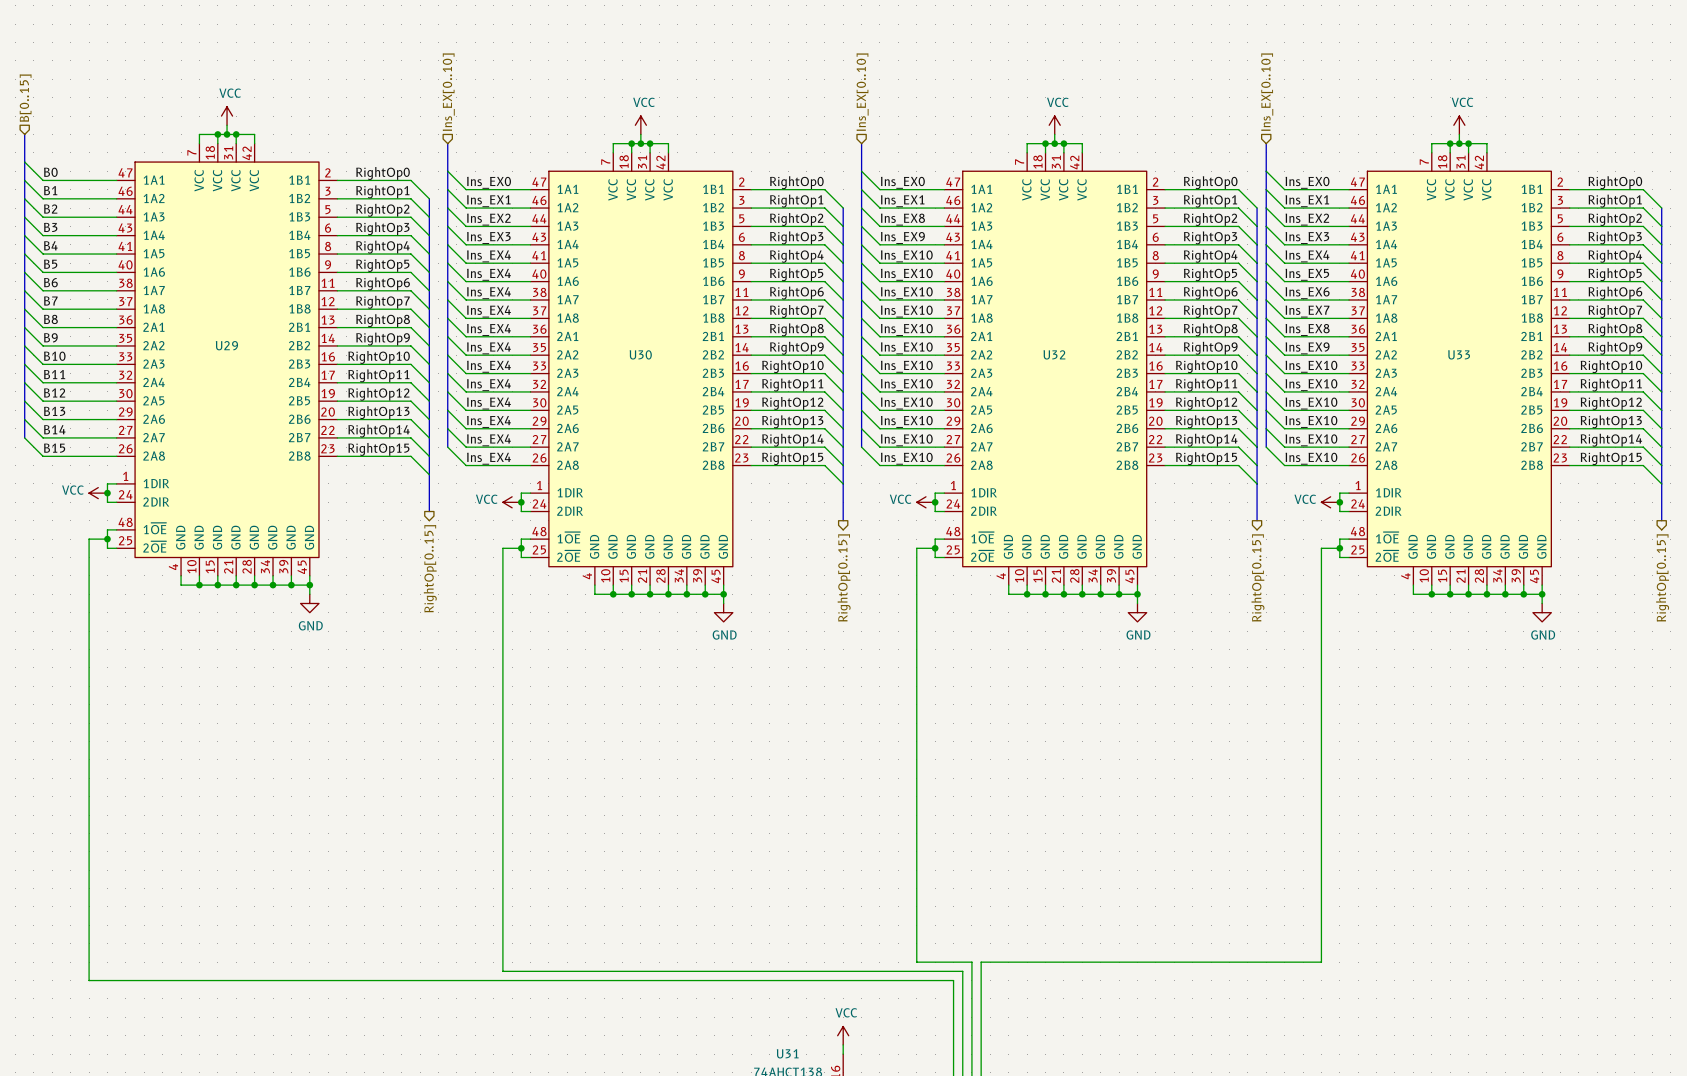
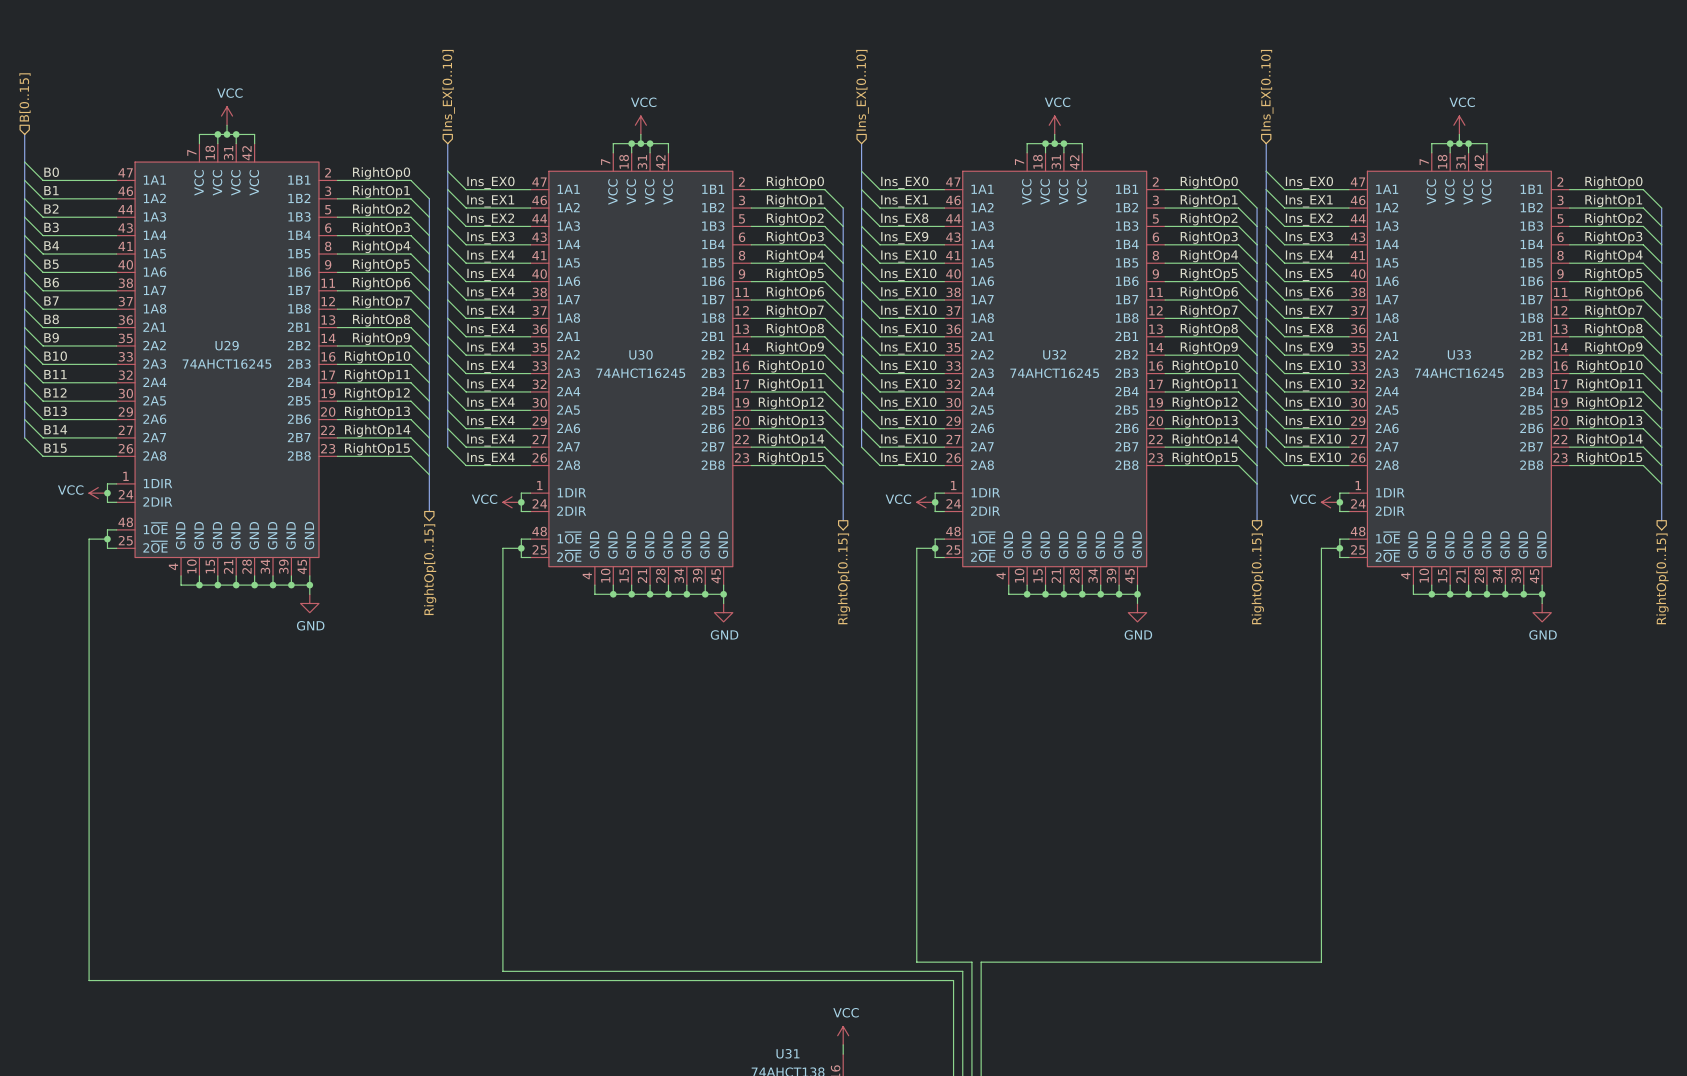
U29 value: none -> 74AHCT16245 (226, 364)
U30 value: none -> 74AHCT16245 (640, 373)
U32 value: none -> 74AHCT16245 (1054, 373)
U33 value: none -> 74AHCT16245 (1459, 373)

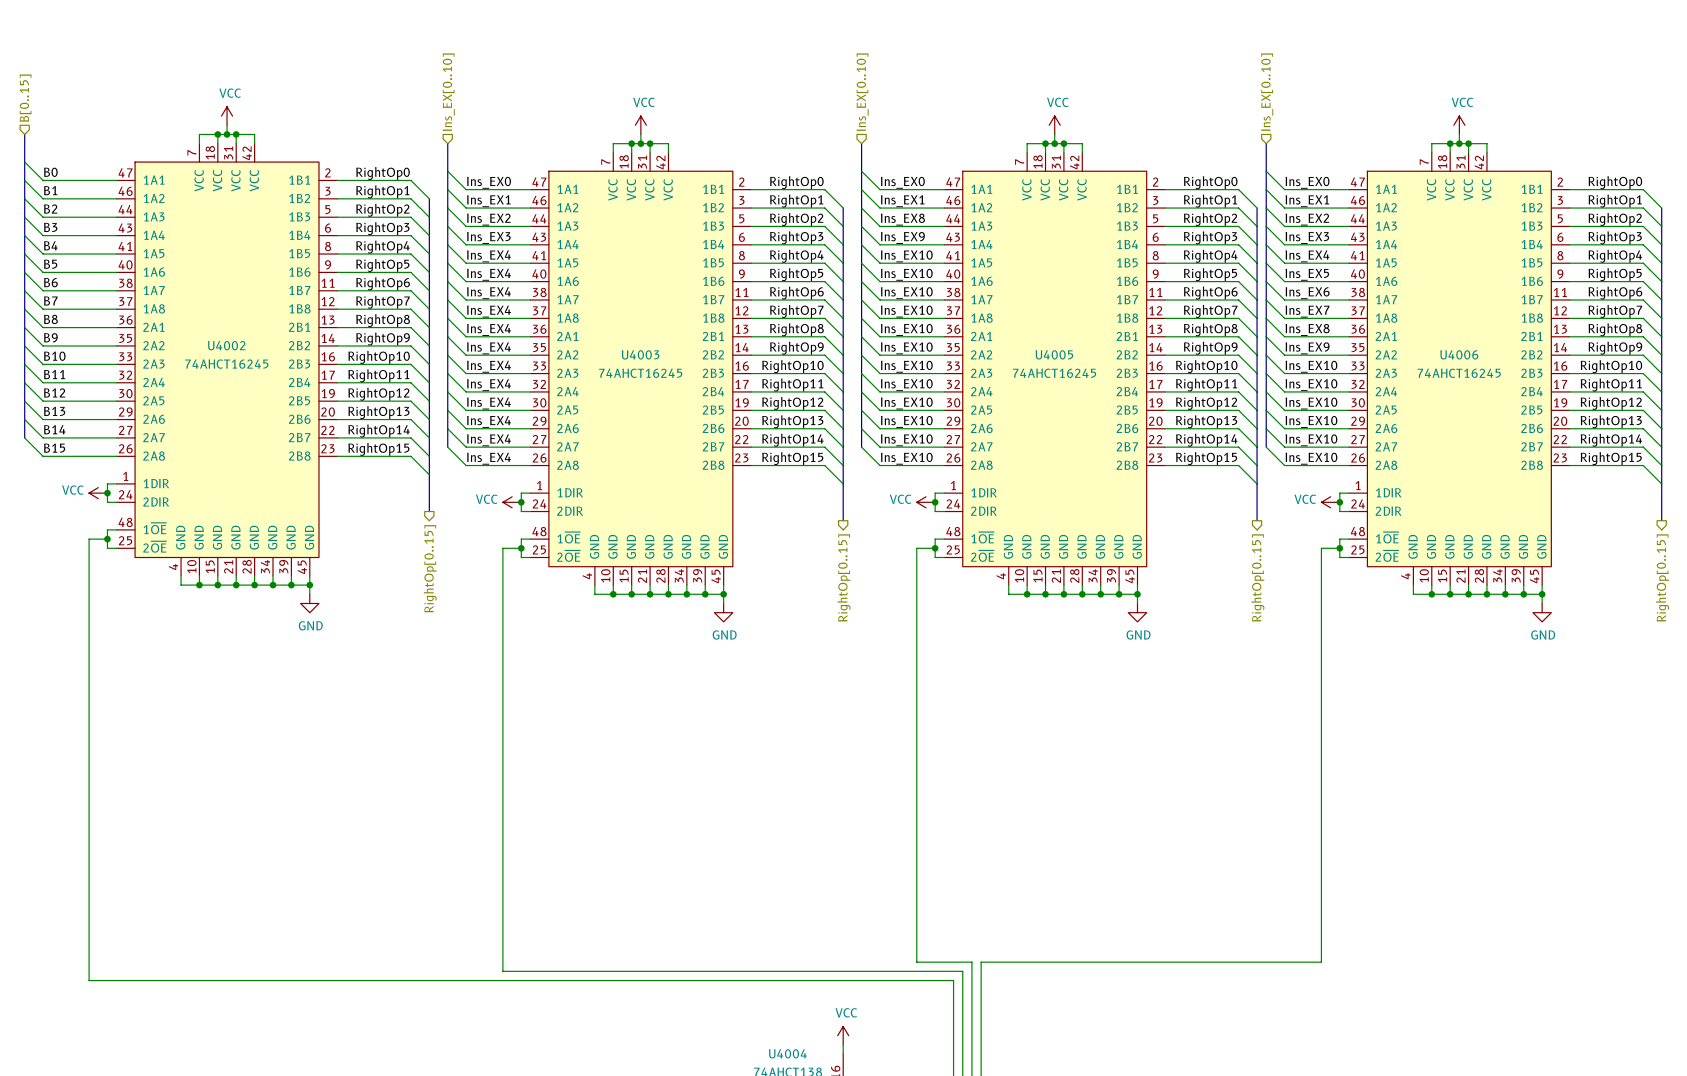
U29 name: U29 (227, 345) -> U4002 (226, 345)
U30 name: U30 (641, 354) -> U4003 (640, 354)
U32 name: U32 (1054, 354) -> U4005 (1054, 354)
U33 name: U33 (1459, 354) -> U4006 (1459, 354)
U31 name: U31 (787, 1053) -> U4004 (787, 1053)

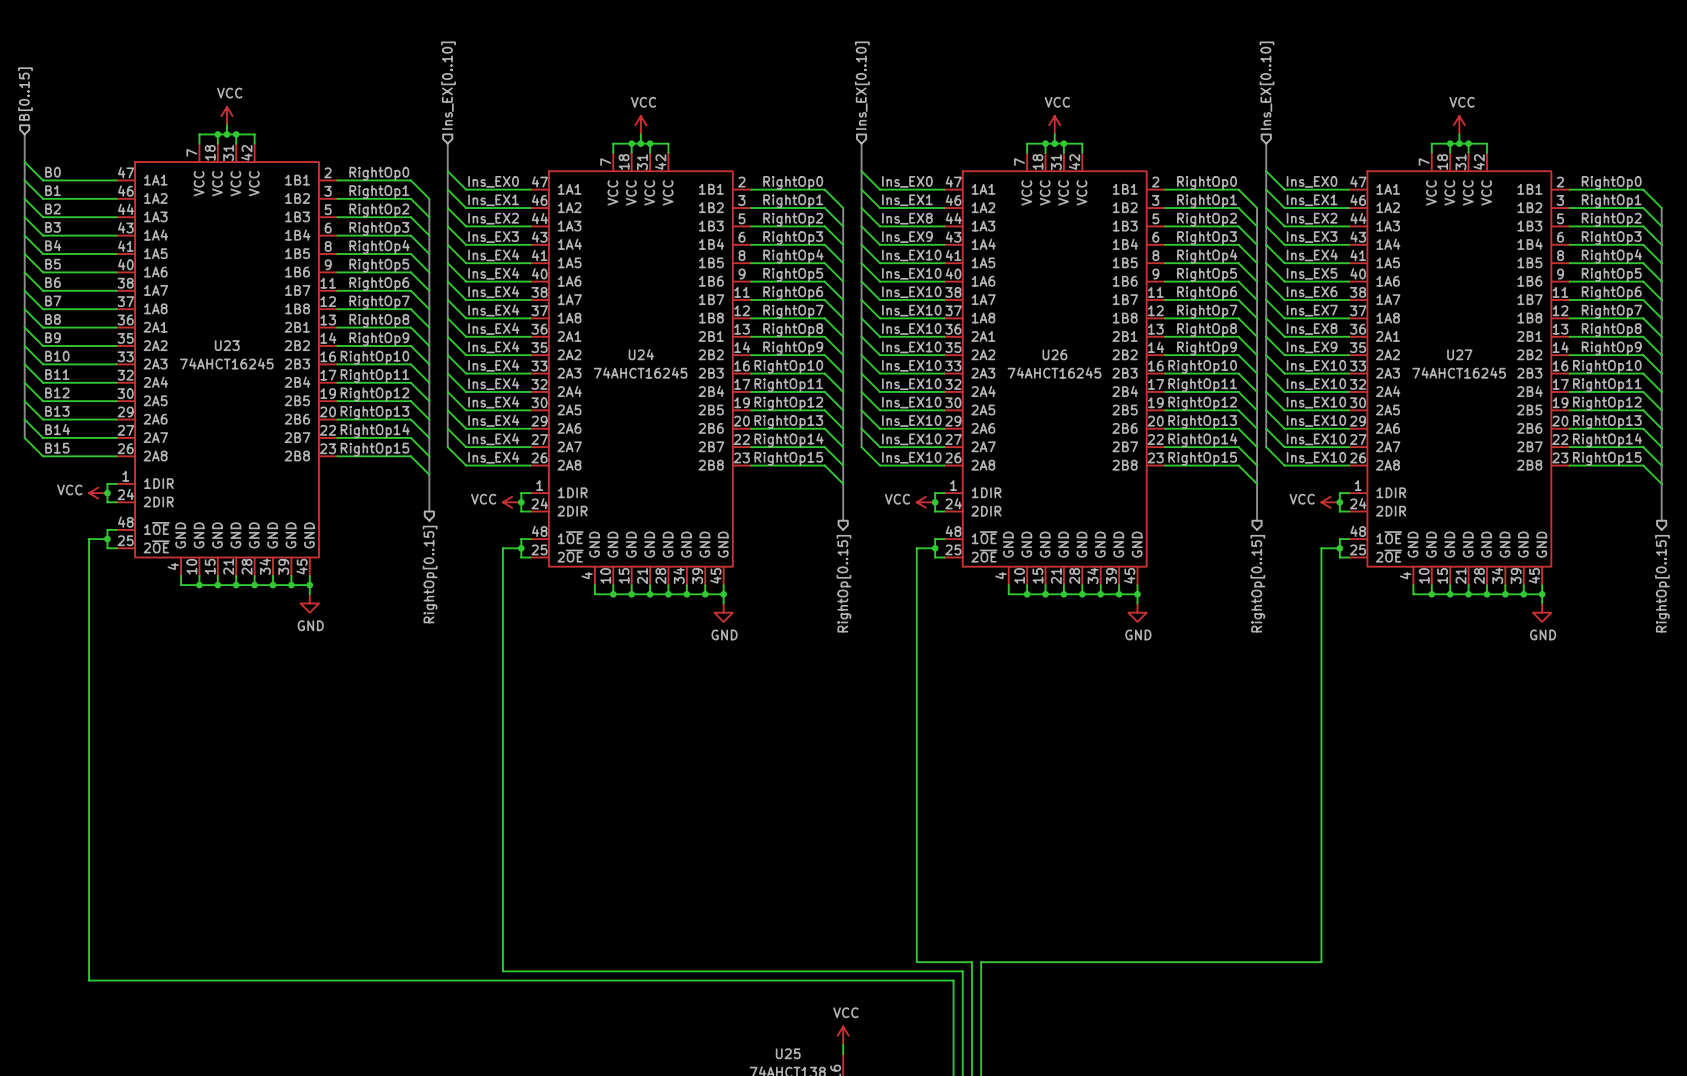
U4002 name: U4002 (226, 345) -> U23 (227, 345)
U4003 name: U4003 (640, 354) -> U24 (641, 354)
U4005 name: U4005 (1054, 354) -> U26 (1054, 354)
U4006 name: U4006 (1459, 354) -> U27 (1459, 354)
U4004 name: U4004 (787, 1053) -> U25 (788, 1053)

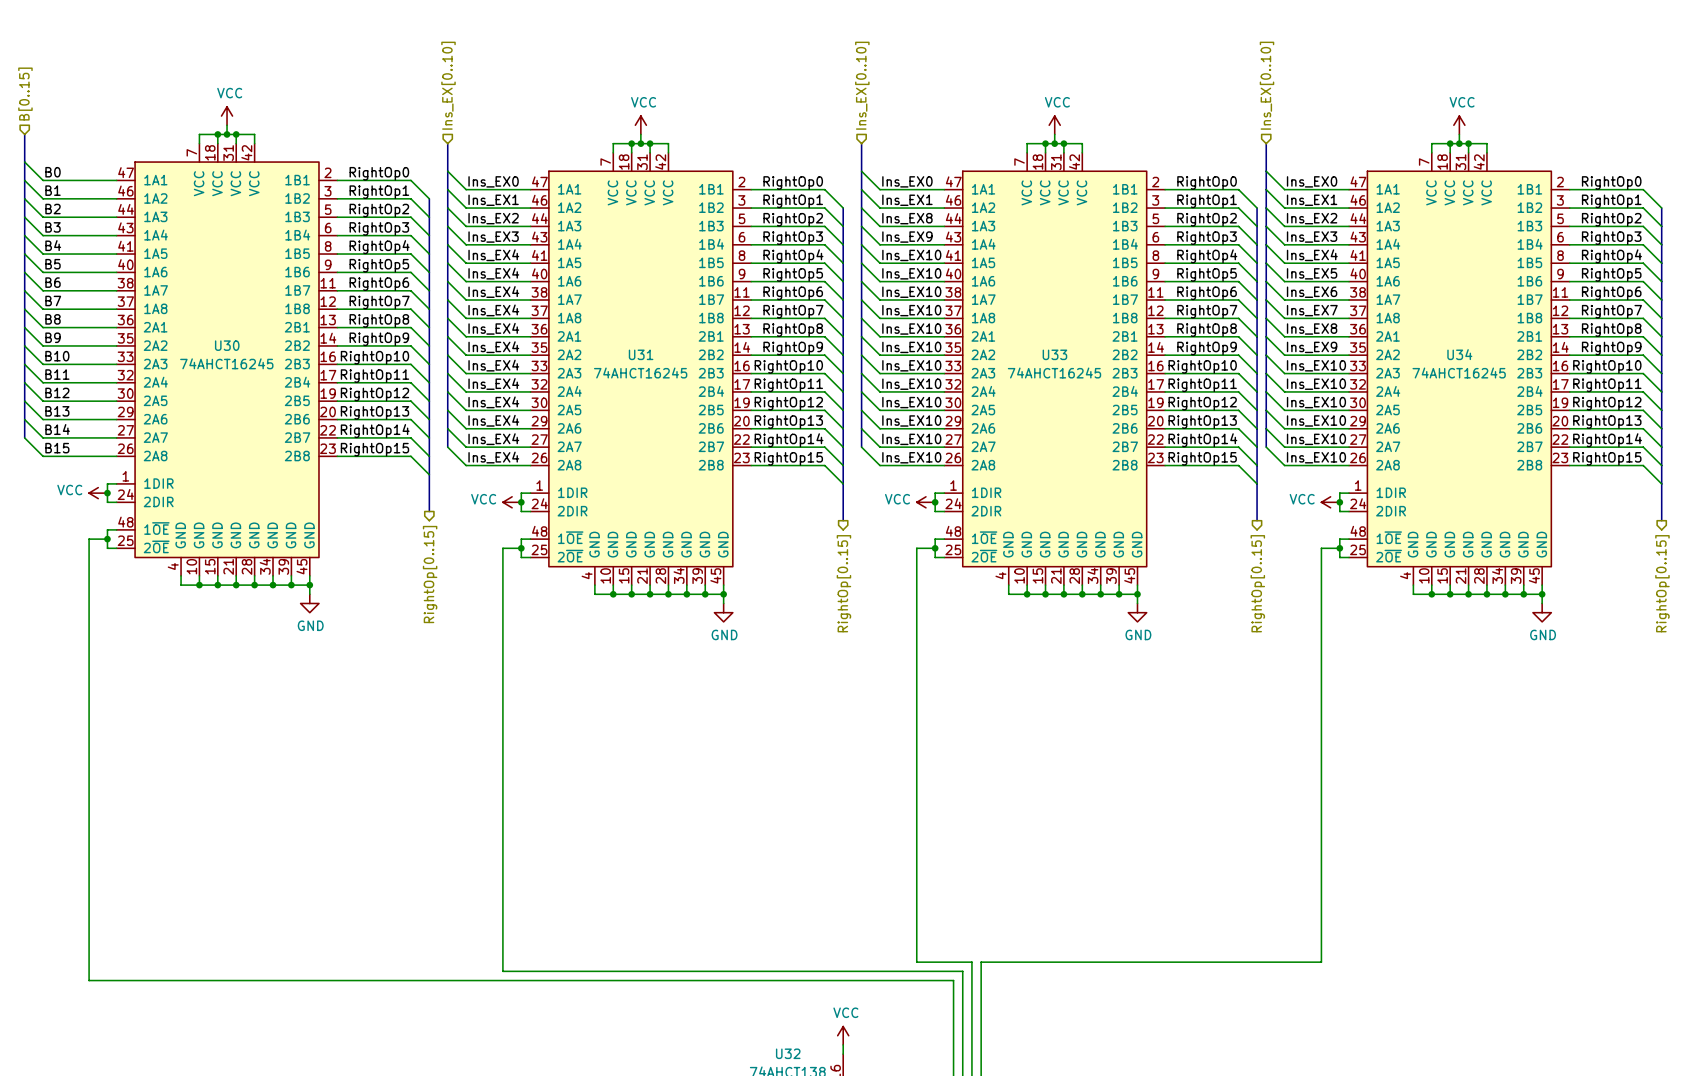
U23 name: U23 (227, 345) -> U30 (227, 345)
U24 name: U24 (641, 354) -> U31 (641, 354)
U26 name: U26 (1054, 354) -> U33 (1054, 354)
U27 name: U27 (1459, 354) -> U34 (1459, 354)
U25 name: U25 (788, 1053) -> U32 (788, 1053)

